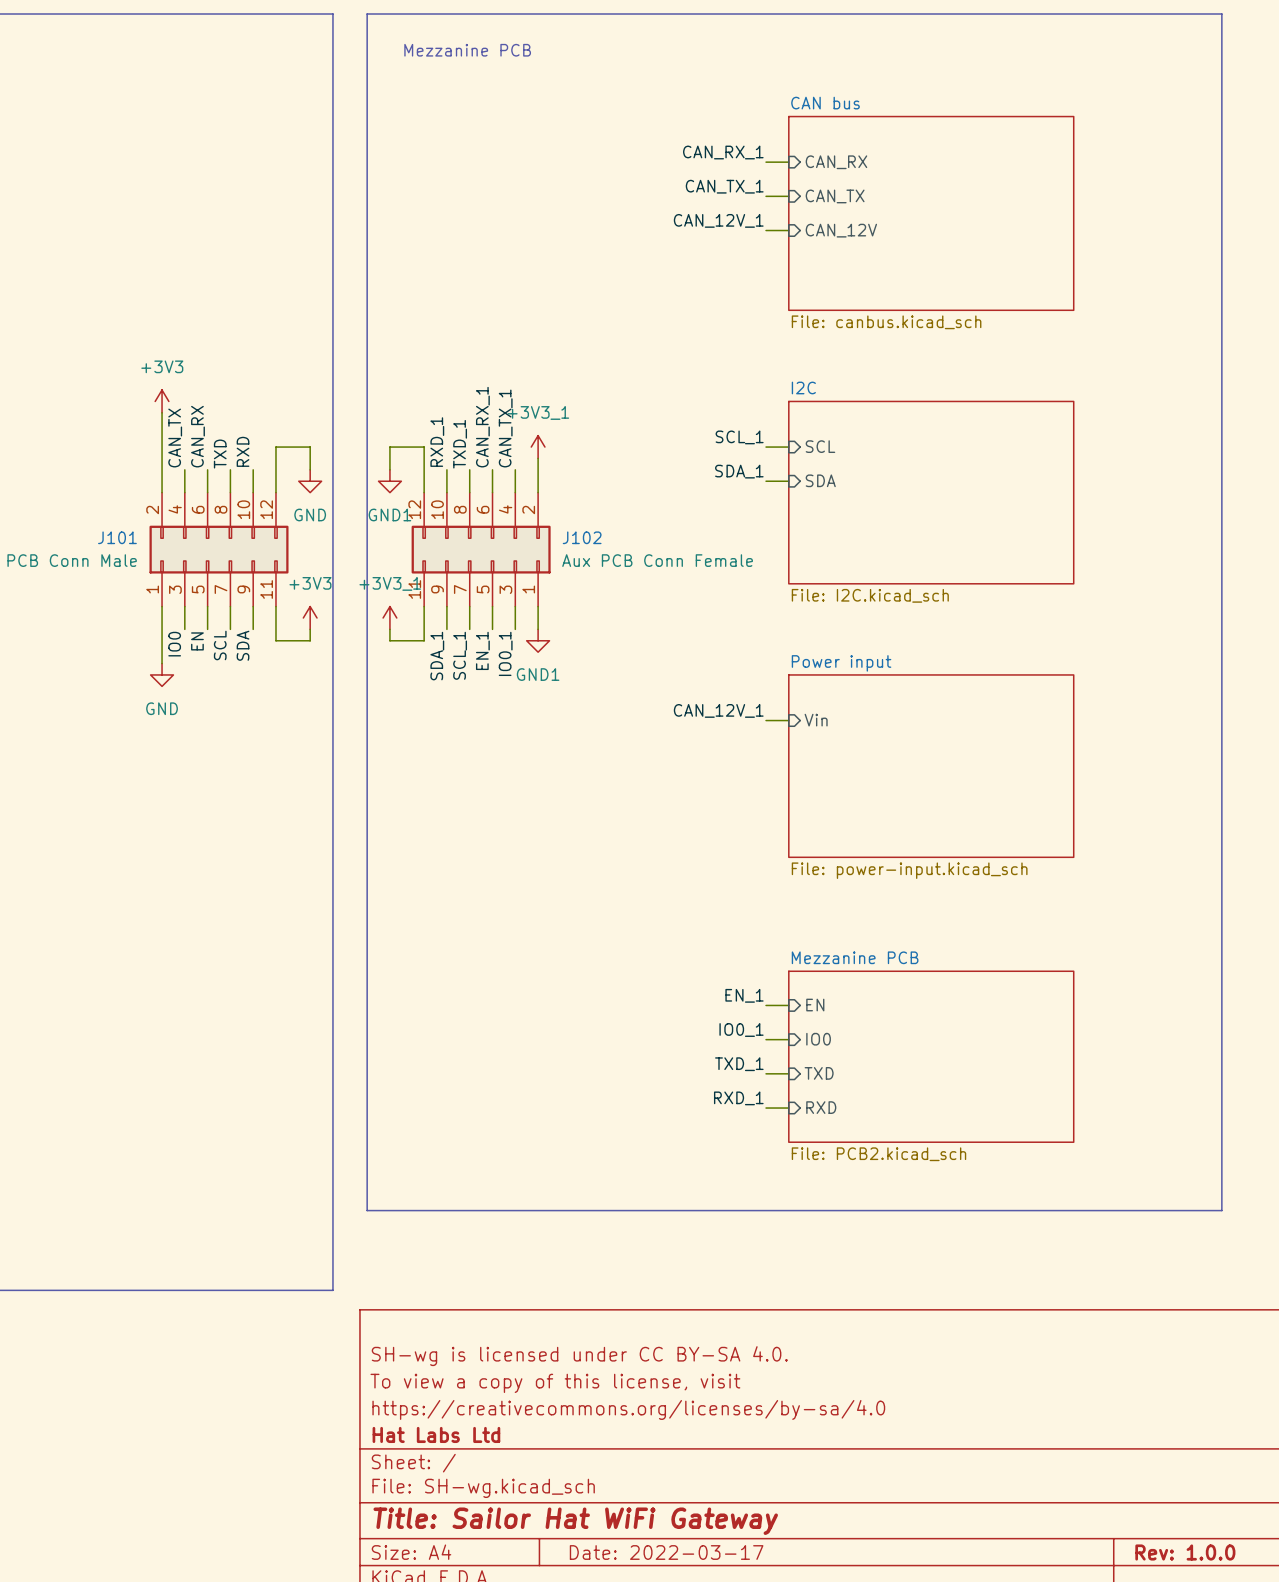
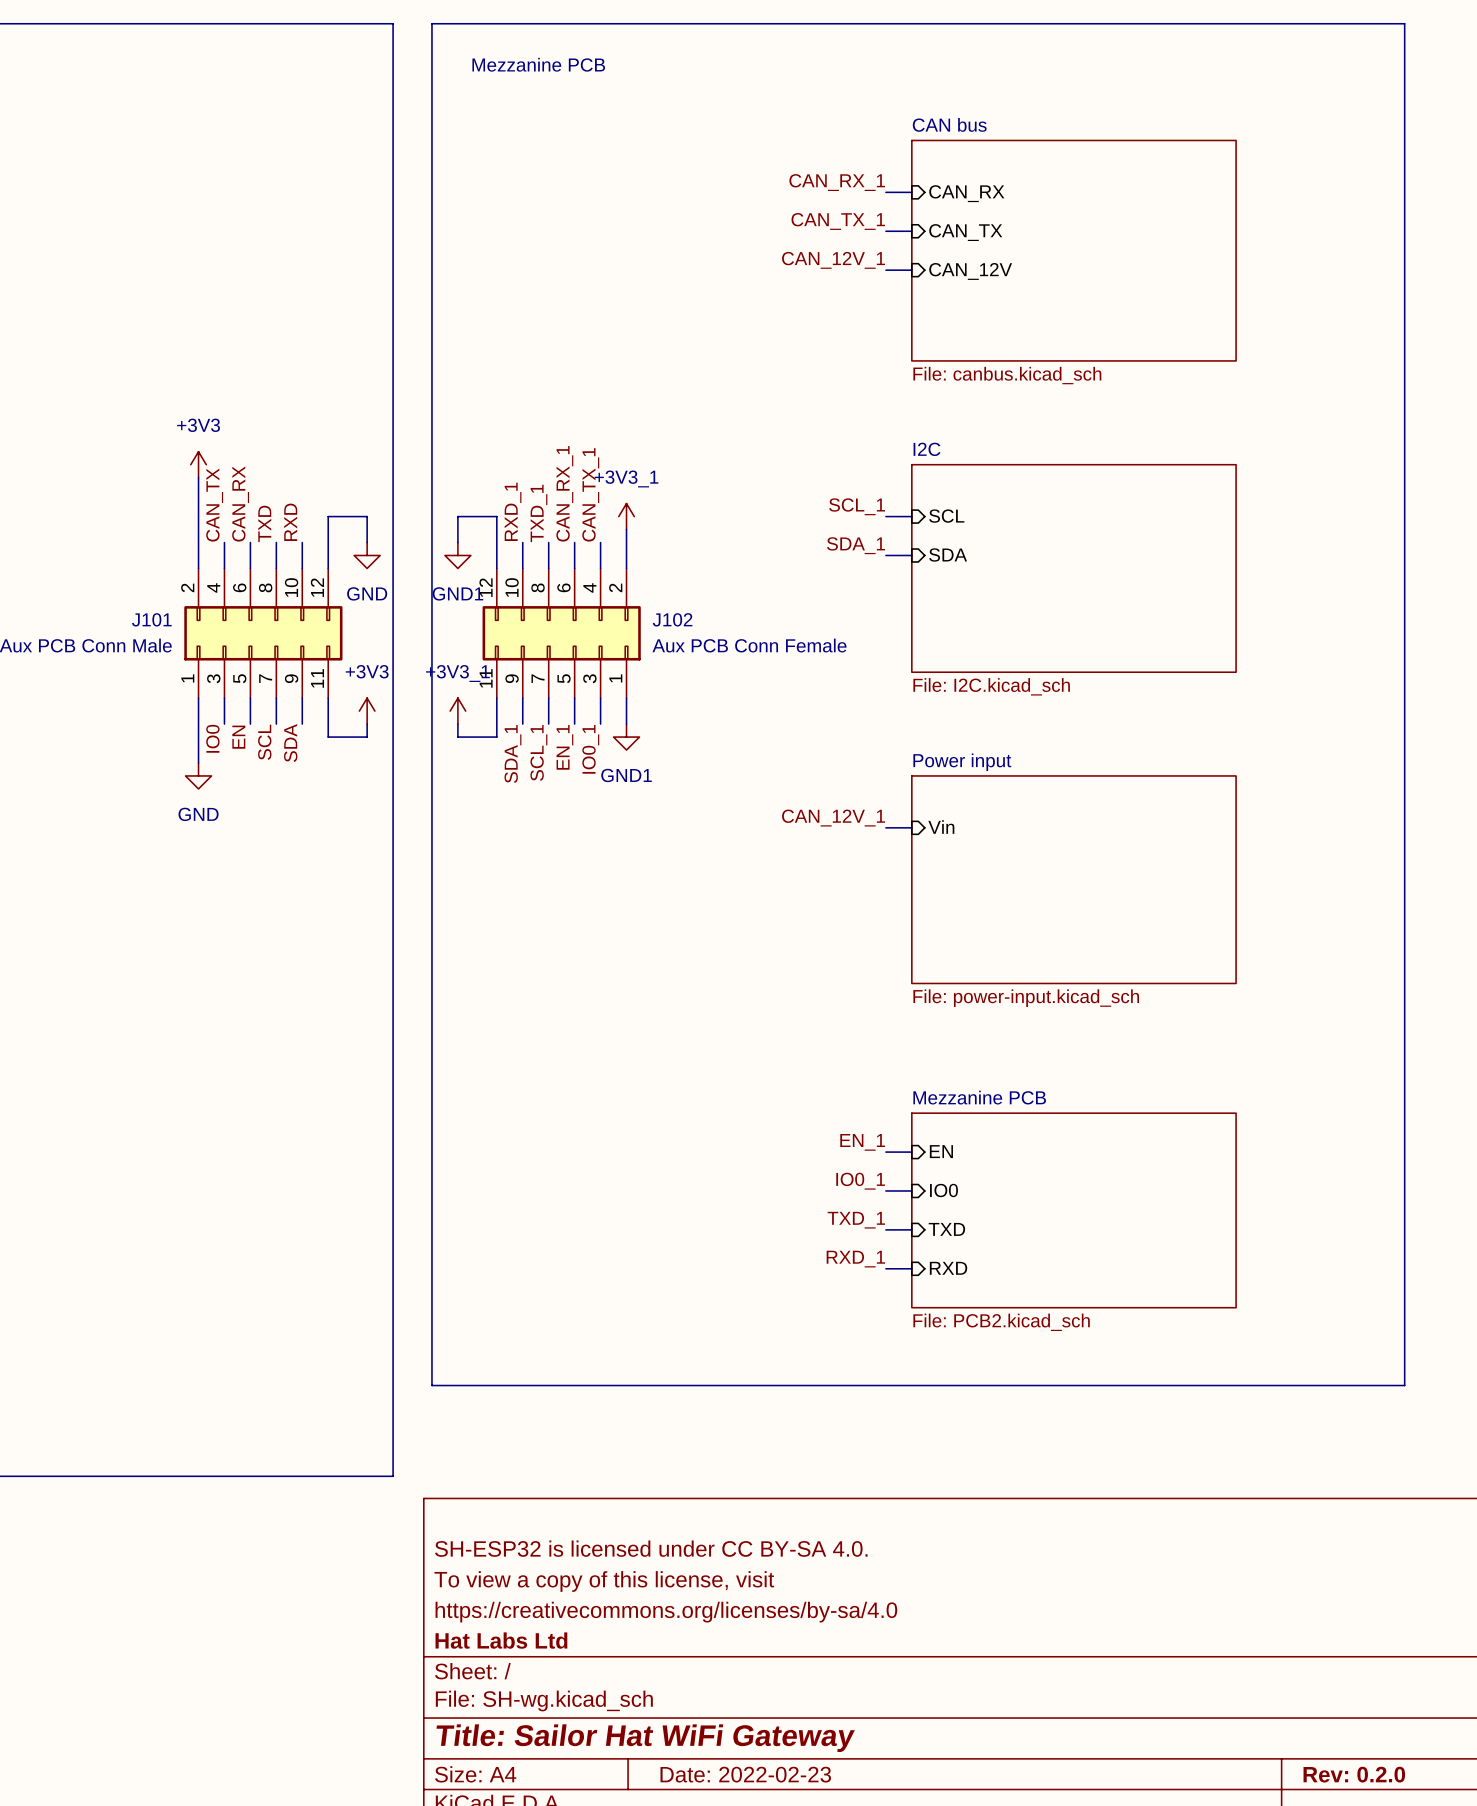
title block: SH-wg is licensed under CC BY-SA 4.0. (579, 1356) -> SH-ESP32 is licensed under CC BY-SA 4.0. (651, 1548)
title block: Date: 2022-03-17 (666, 1552) -> Date: 2022-02-23 (745, 1774)
title block: Rev: 1.0.0 (1185, 1552) -> Rev: 0.2.0 (1354, 1774)

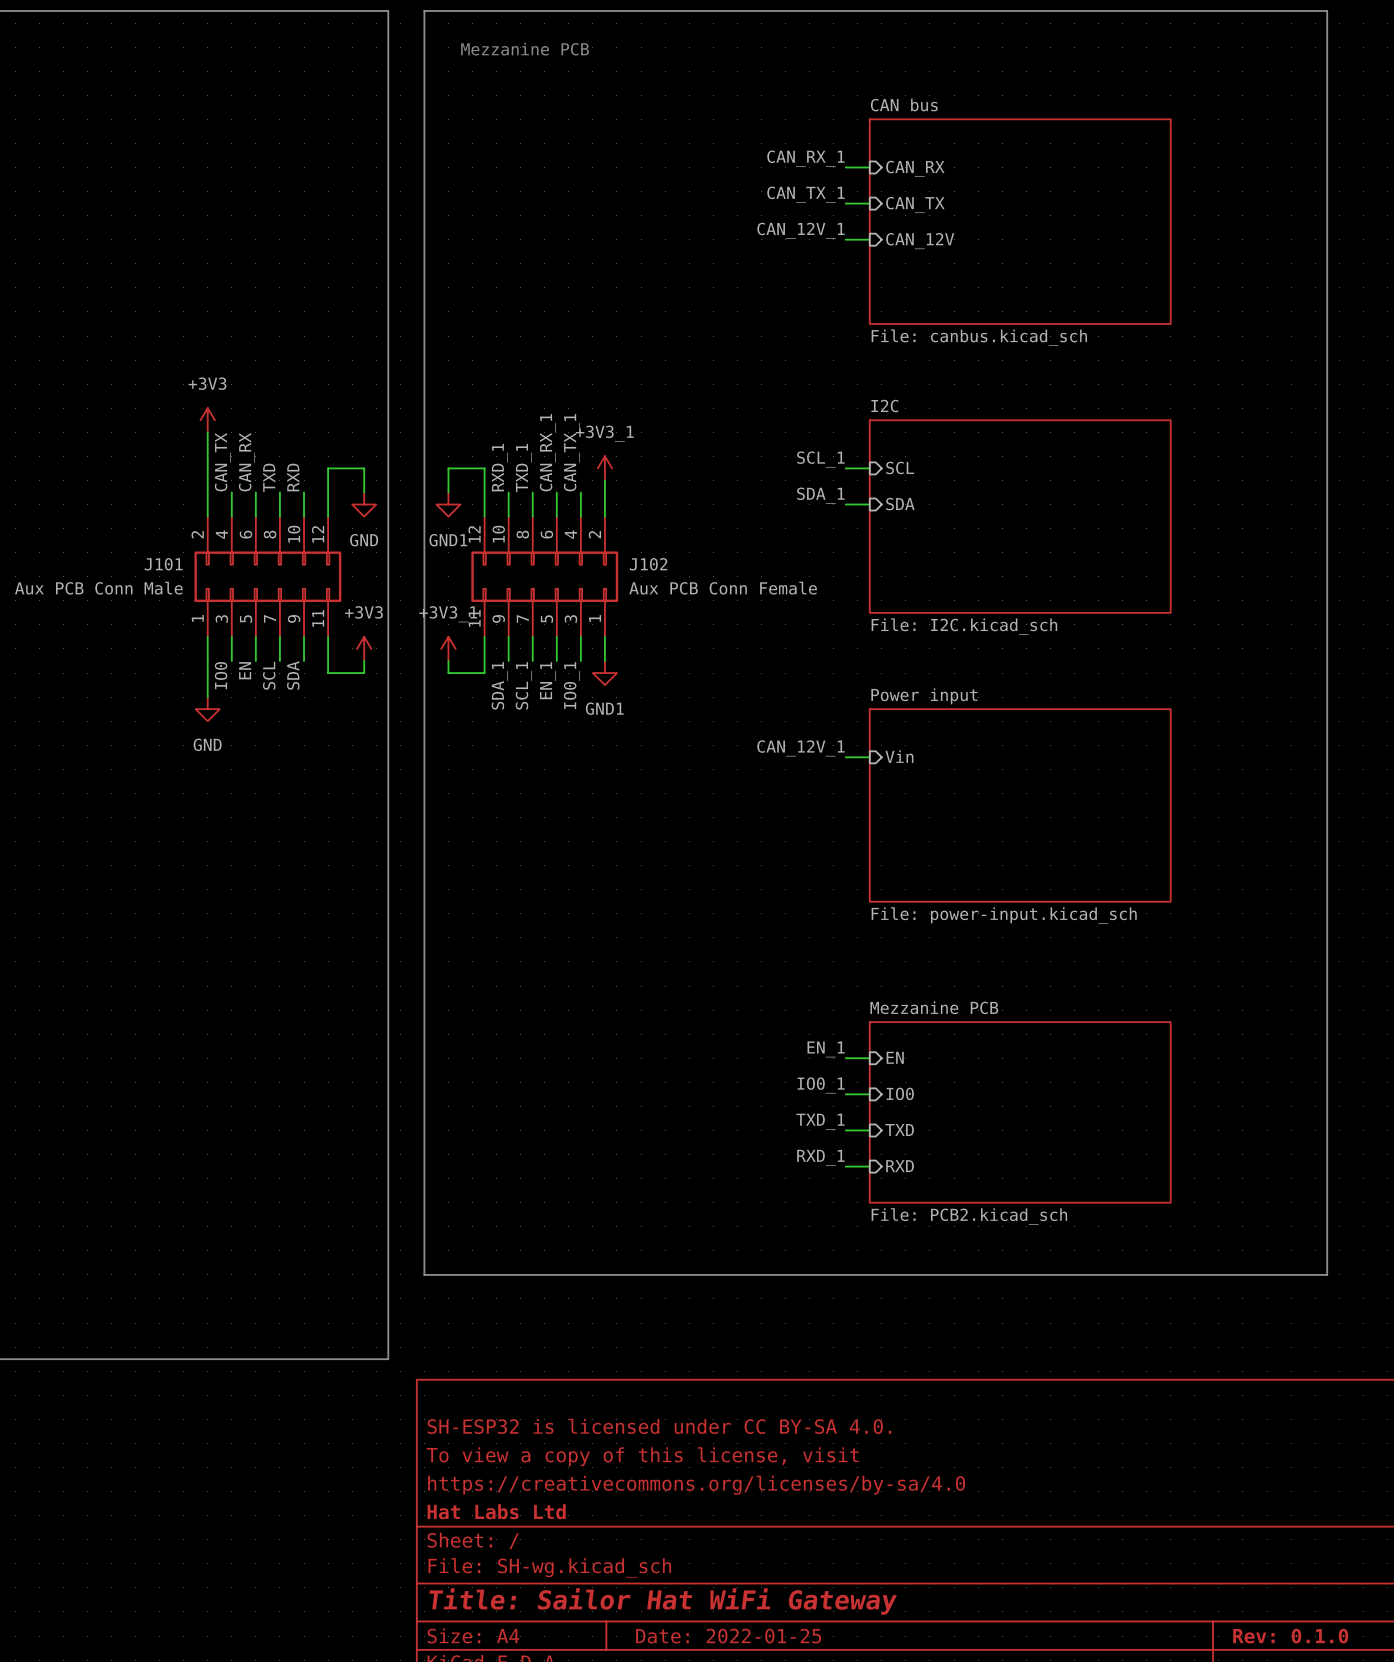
title block: Date: 2022-02-23 (745, 1774) -> Date: 2022-01-25 (728, 1636)
title block: Rev: 0.2.0 (1354, 1774) -> Rev: 0.1.0 (1290, 1636)

